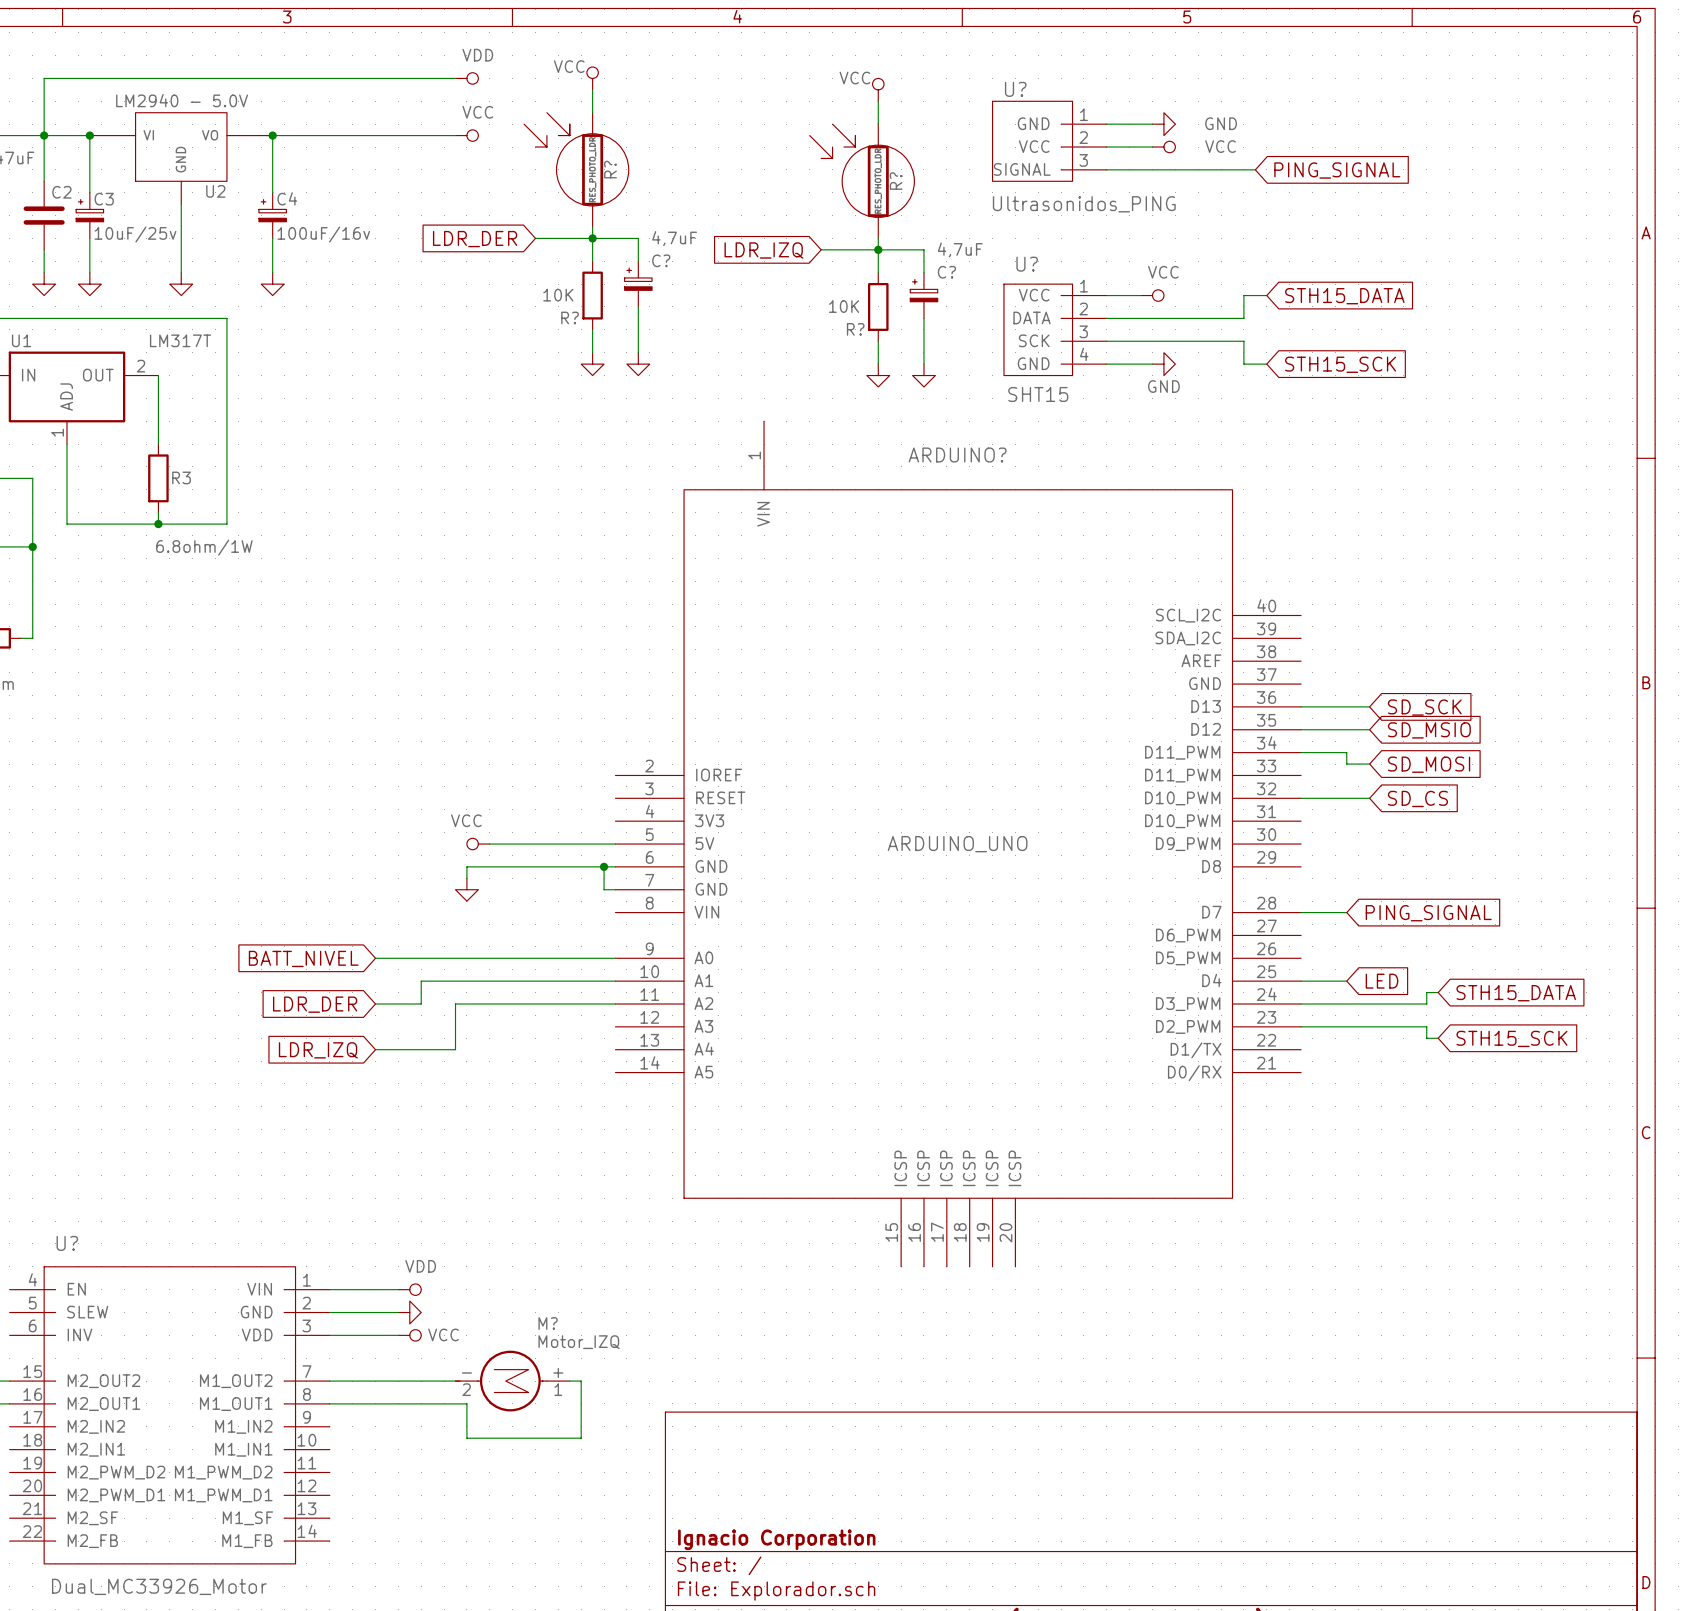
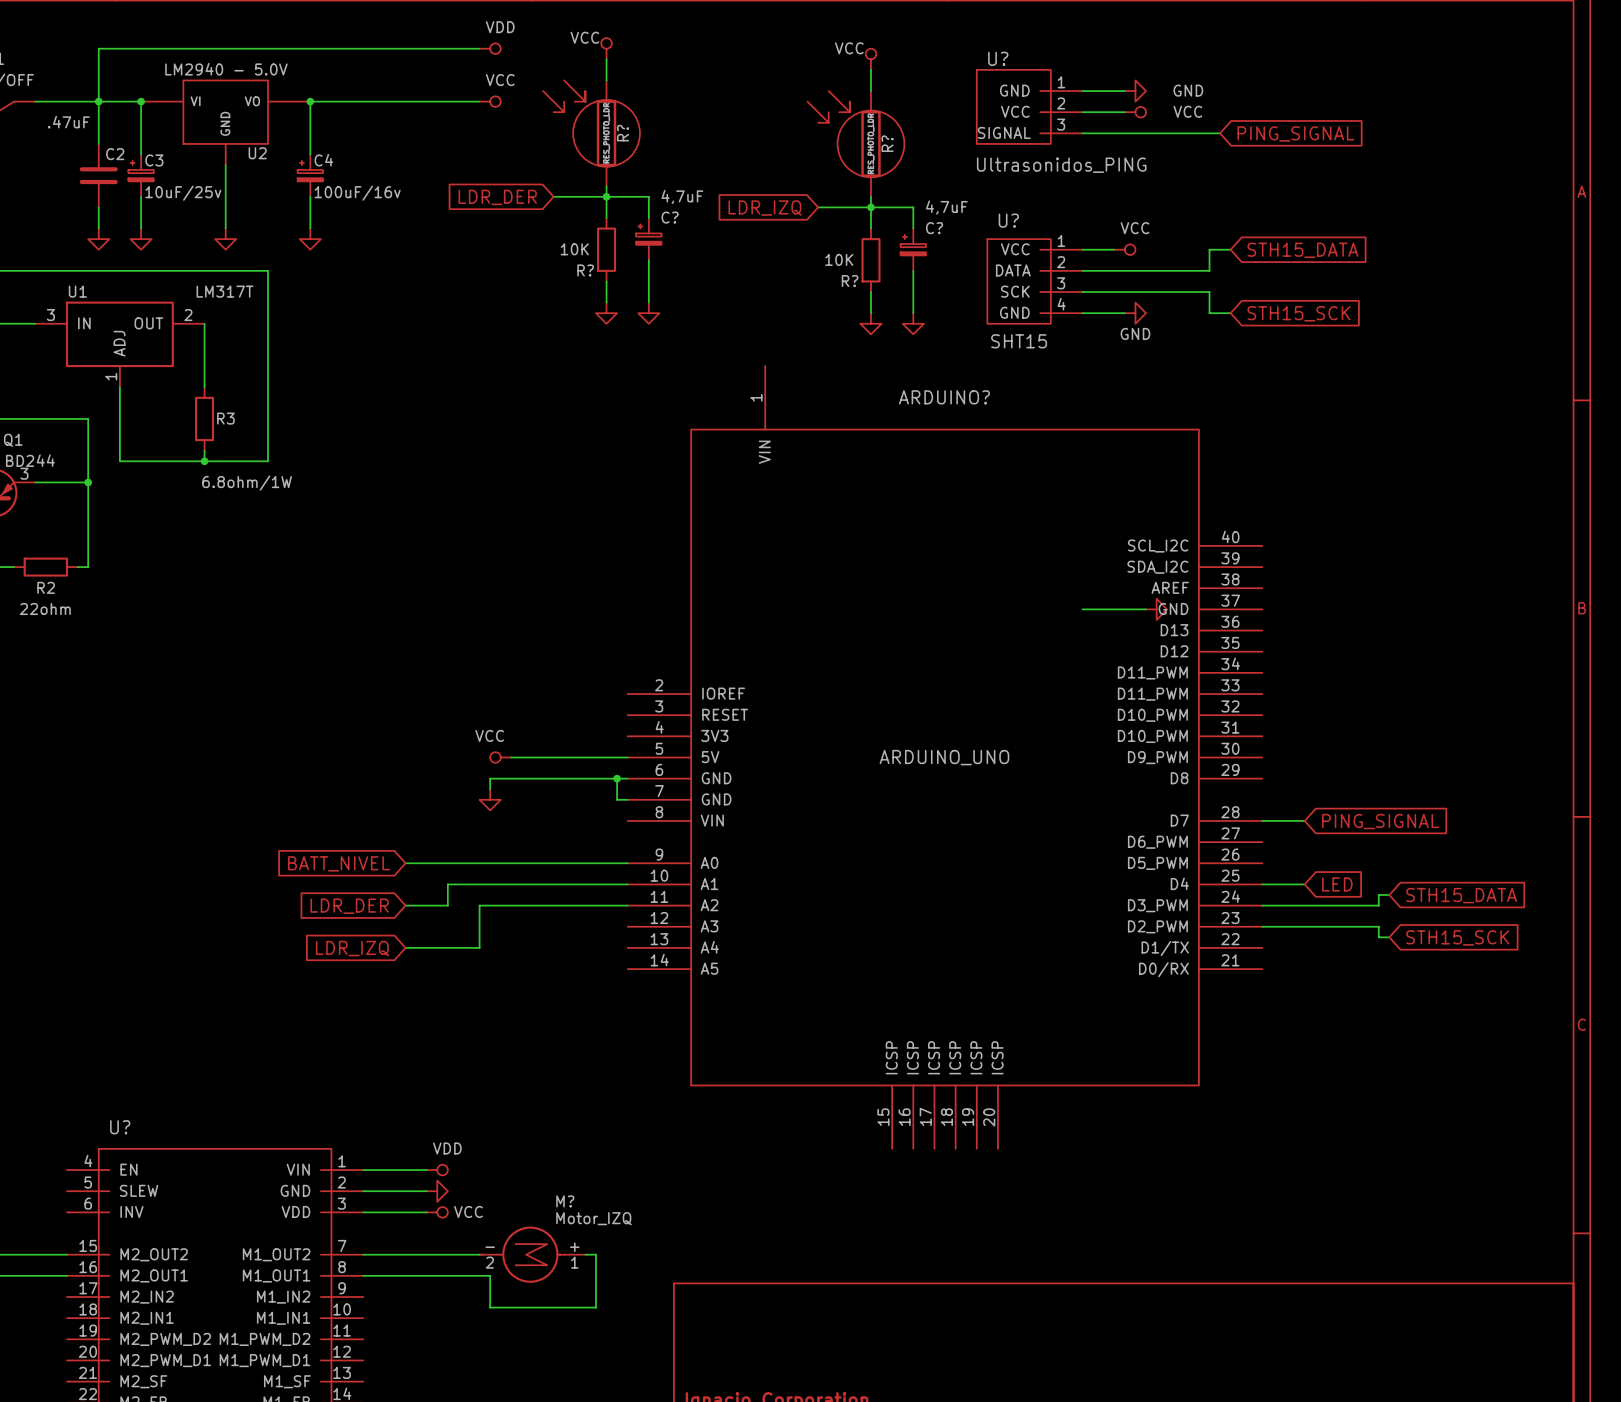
power symbol: none -> (1156, 609)
wire: (1301, 706) (1369, 706) -> (1082, 609) (1146, 609)
global label: SD_SCK (1424, 707) -> none
wire: (1301, 729) (1369, 729) -> none
global label: SD_MSIO (1429, 730) -> none
wire: (1301, 752) (1346, 752) (1346, 764) (1369, 764) -> none
global label: SD_MOSI (1429, 764) -> none
wire: (1301, 798) (1369, 798) -> none
global label: SD_CS (1417, 798) -> none

